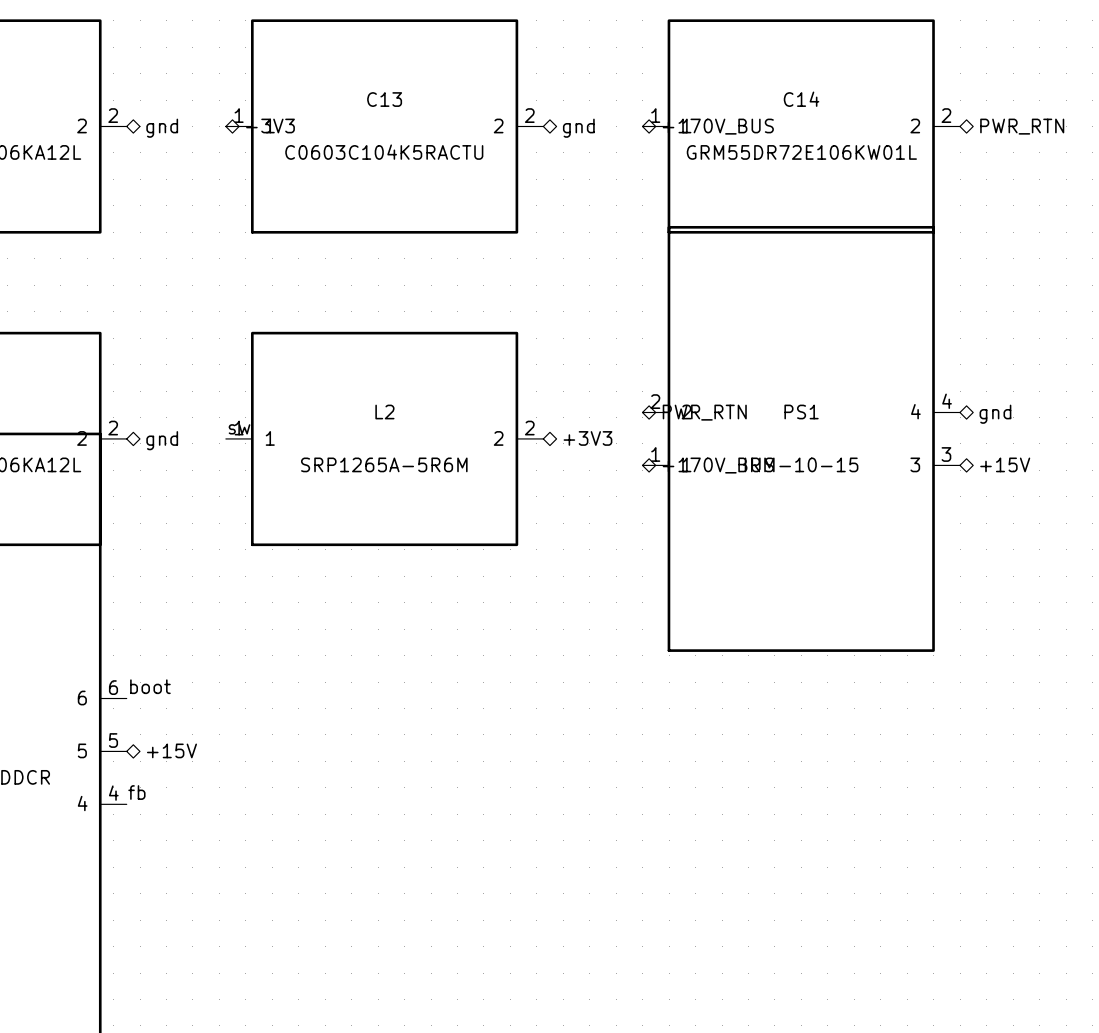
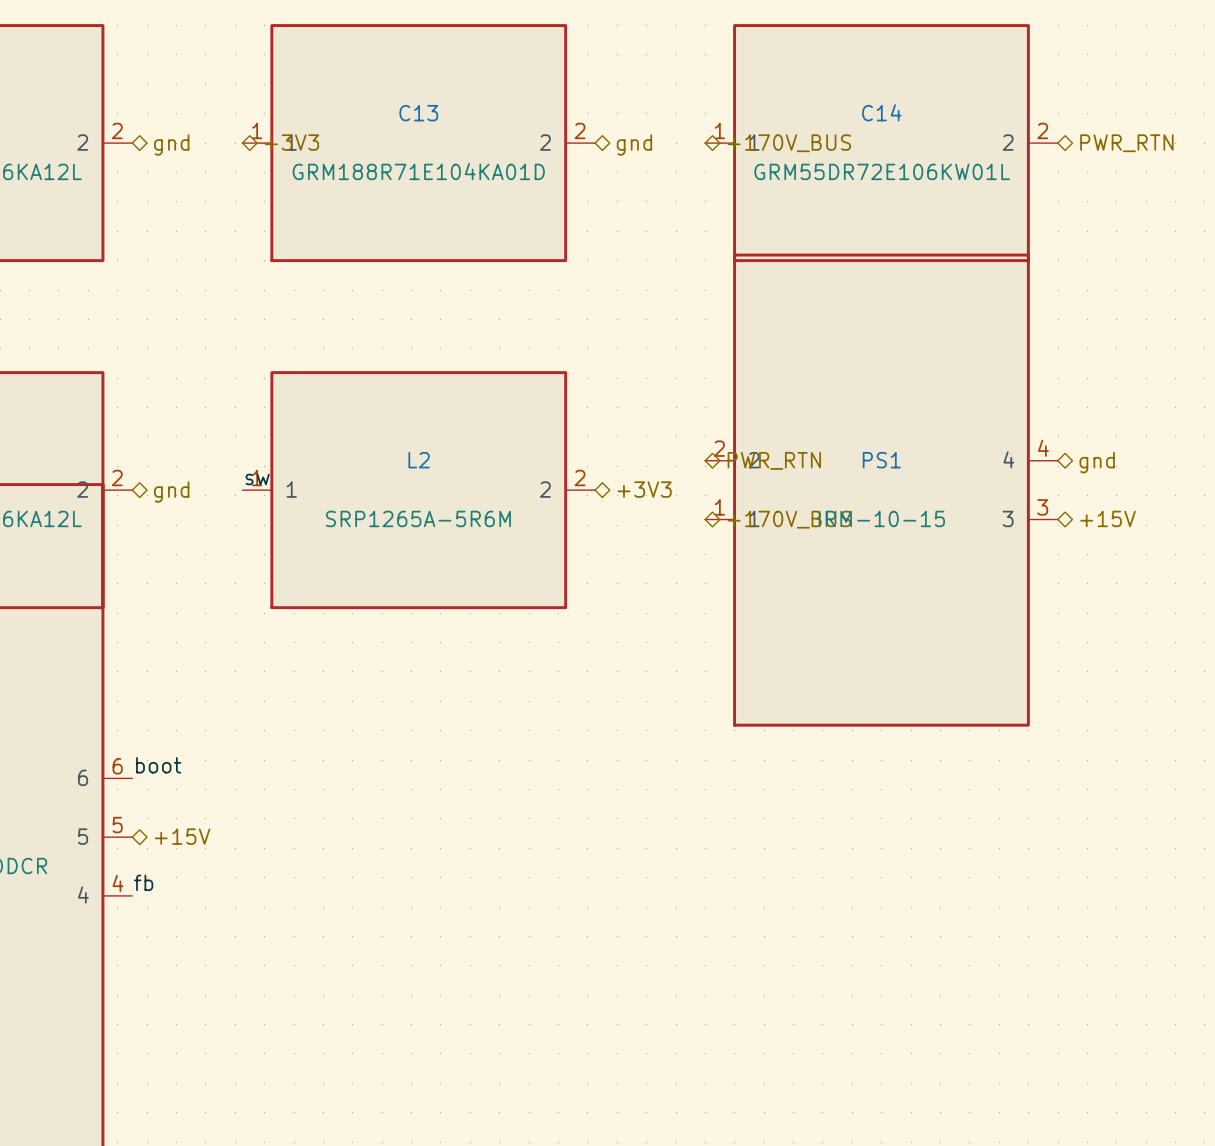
C13 value: C0603C104K5RACTU (384, 152) -> GRM188R71E104KA01D (418, 171)

